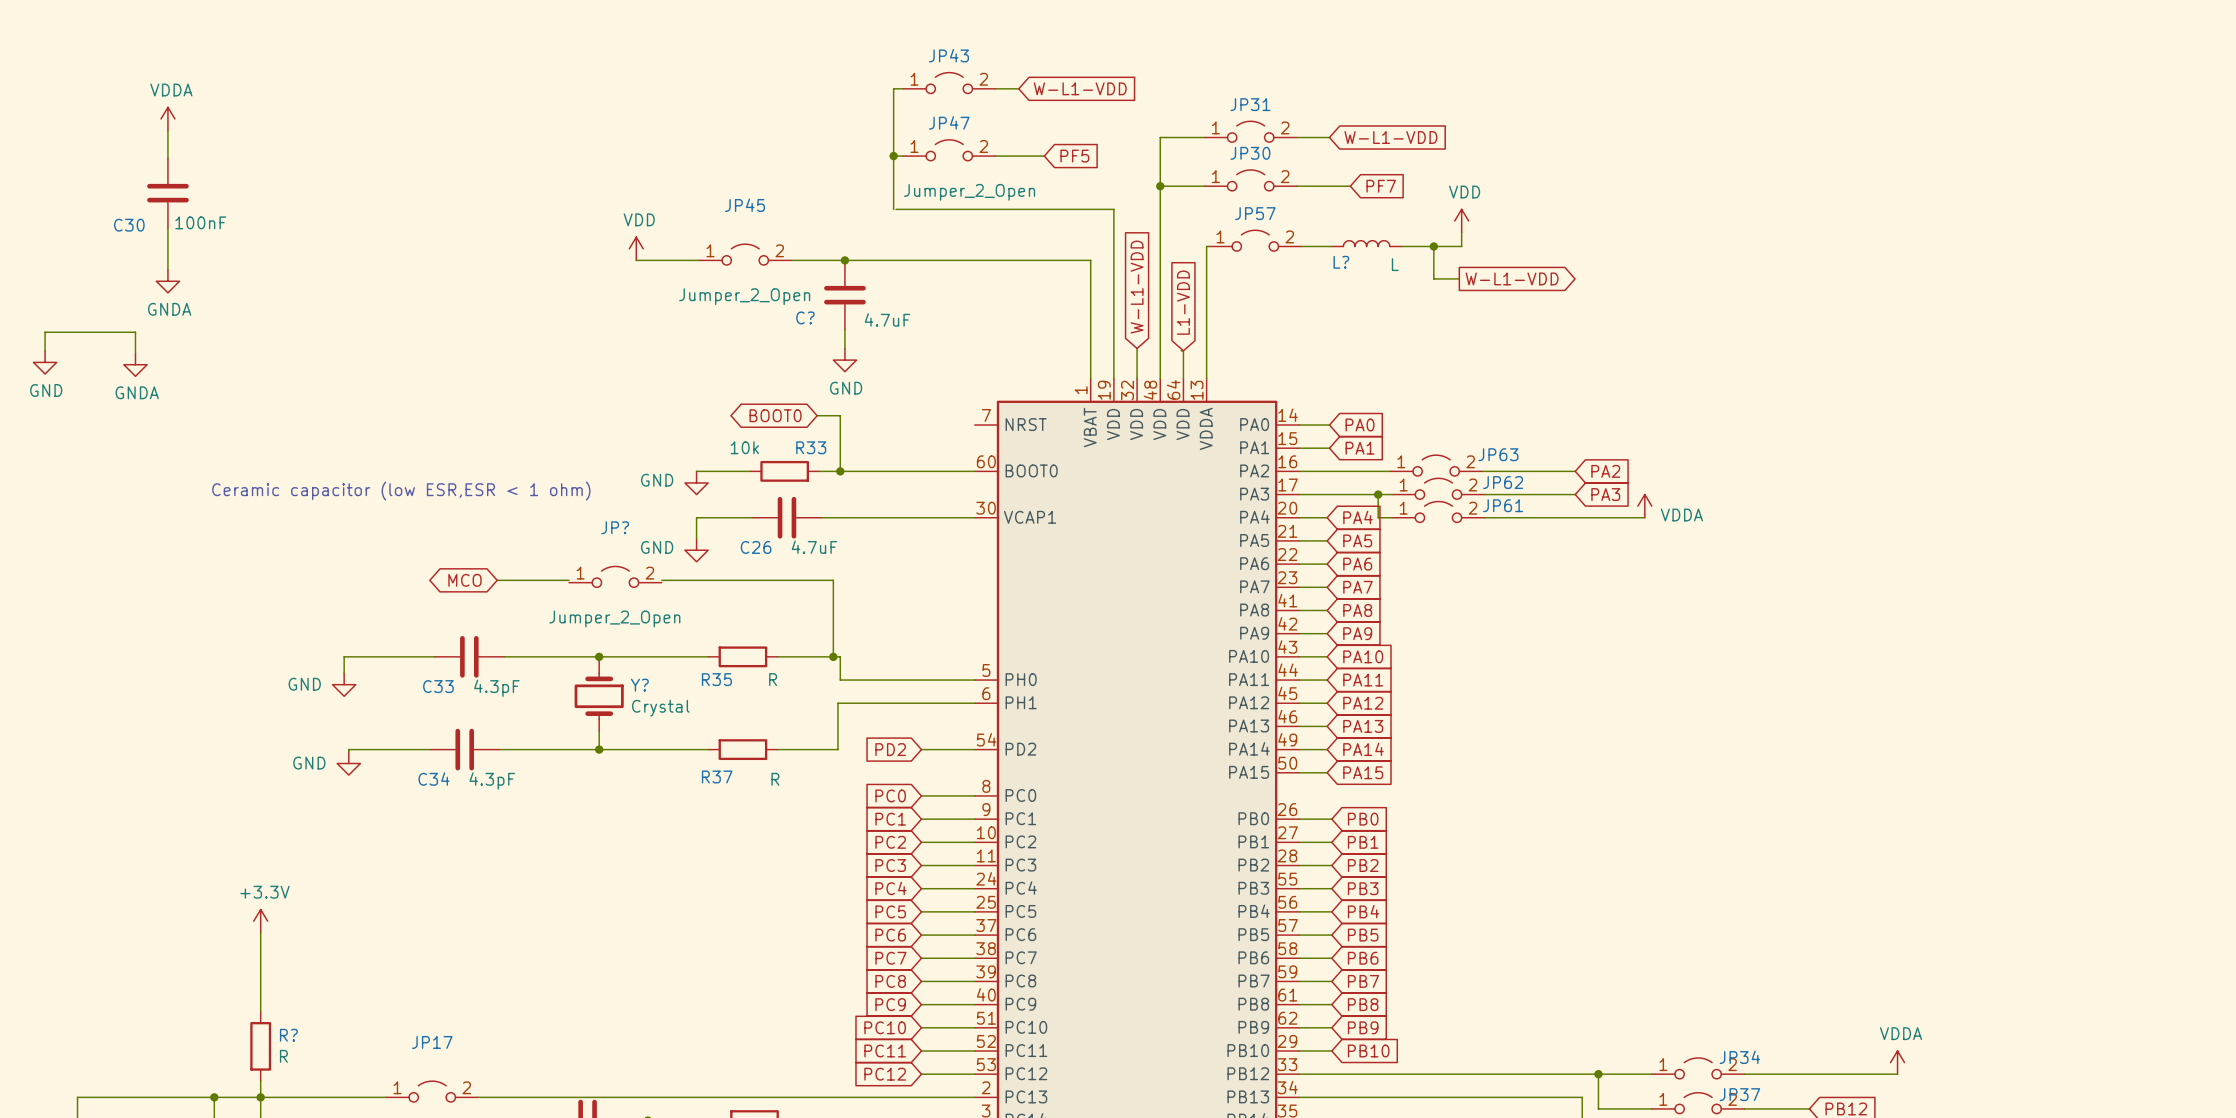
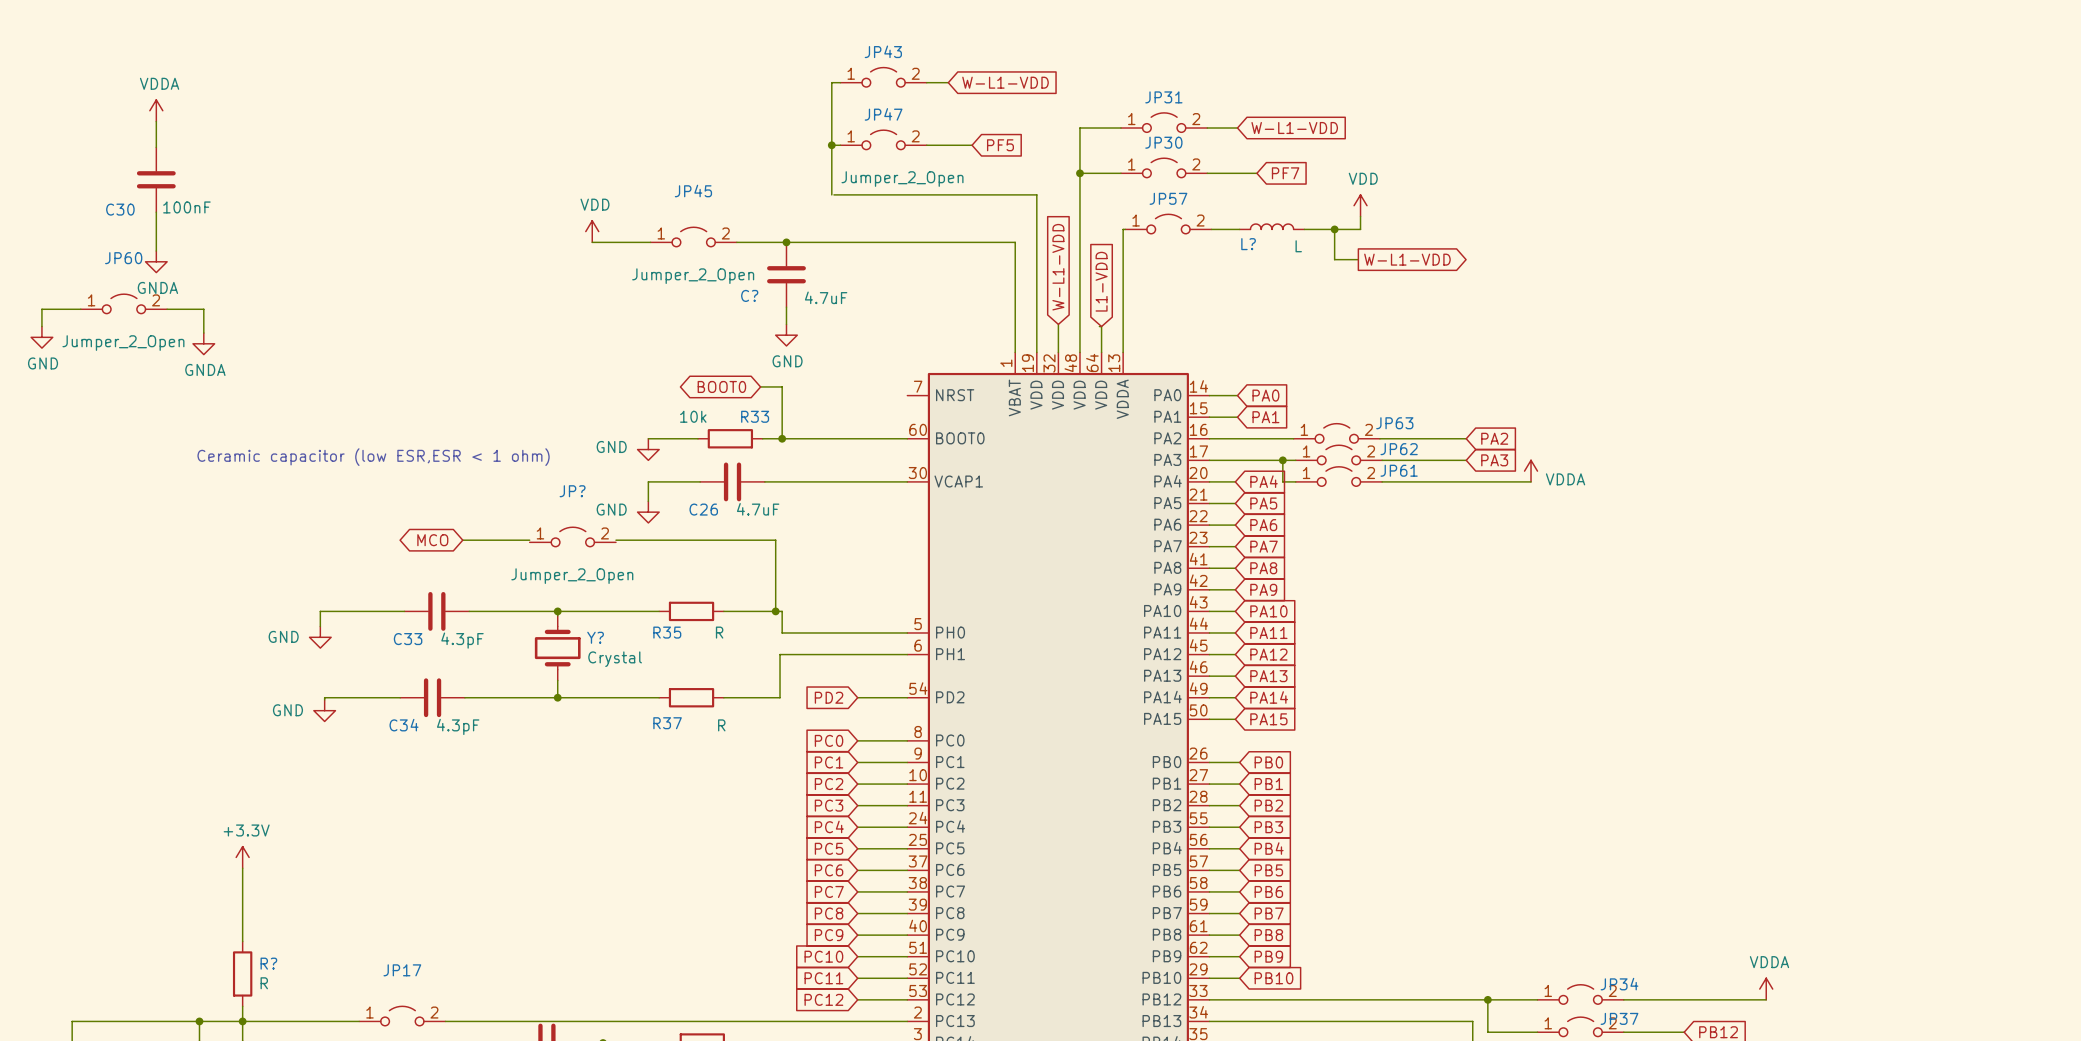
JP60: none -> Jumper_2_Open (123, 303)
wire: (86, 332) (135, 332) (135, 353) -> none
wire: none -> (167, 309) (203, 309) (203, 333)
power symbol position: GNDA (135, 364) -> GNDA (203, 343)

